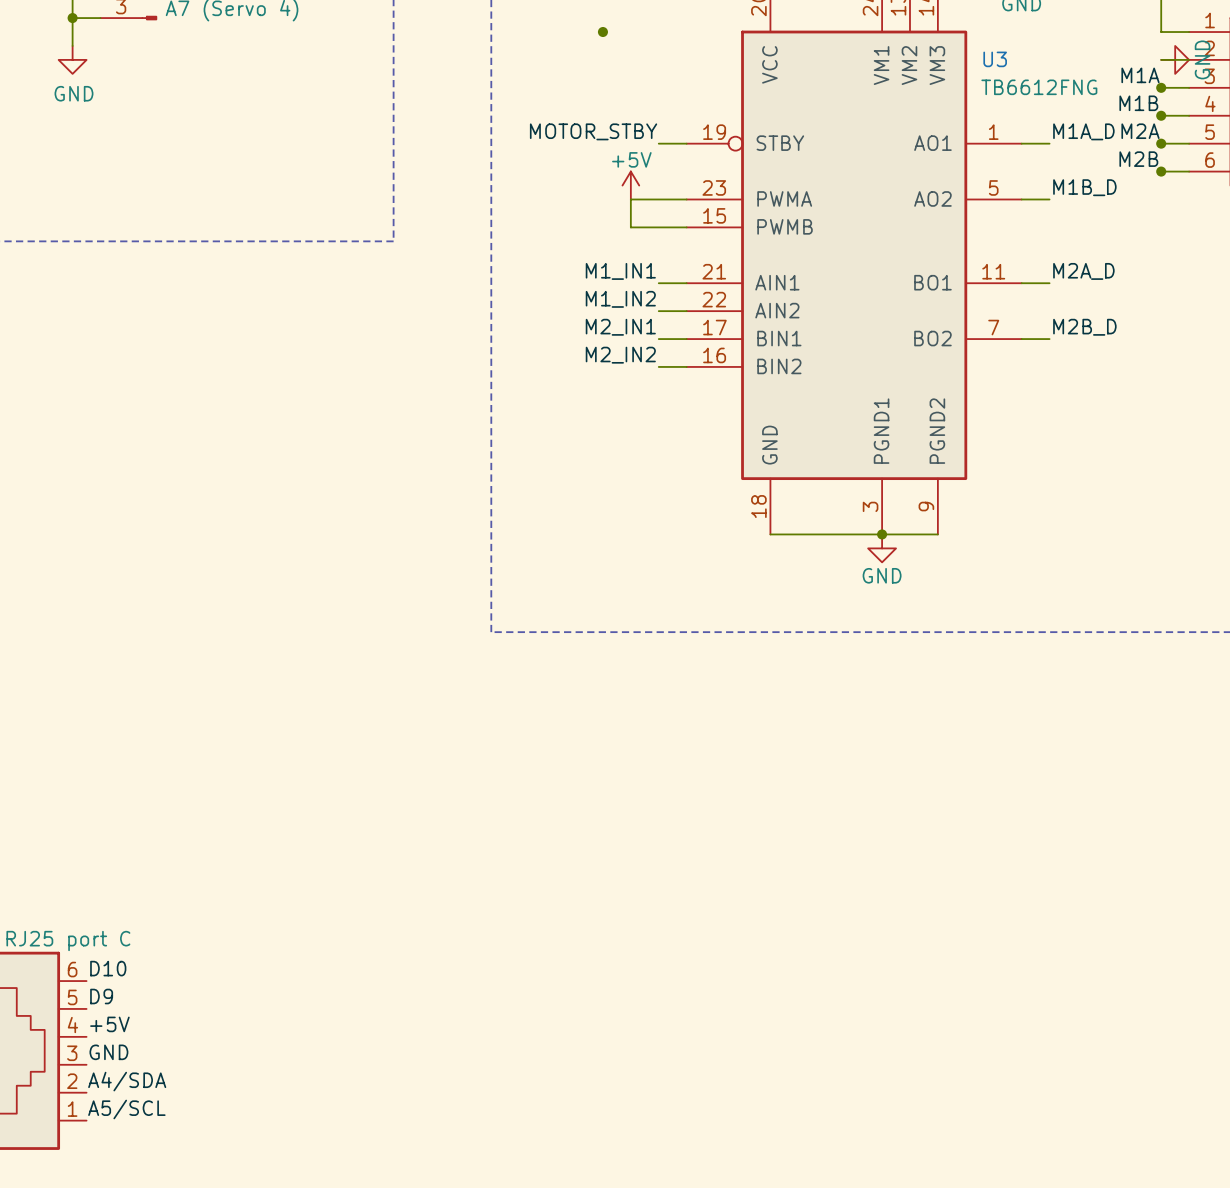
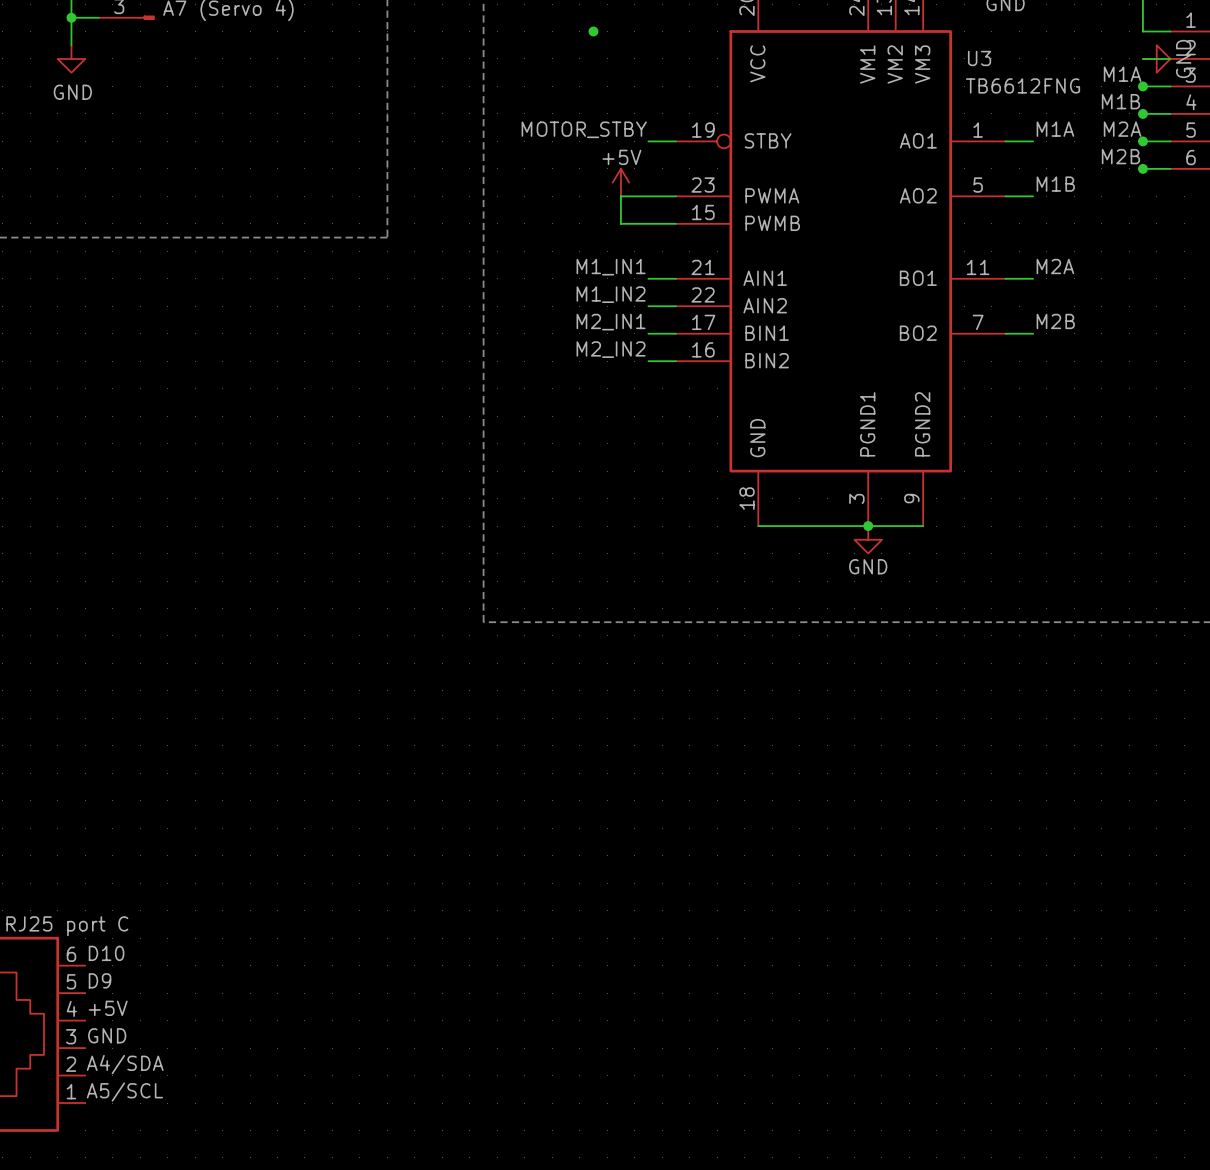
label: M1A_D (1083, 131) -> M1A (1055, 129)
label: M1B_D (1084, 187) -> M1B (1055, 184)
label: M2A_D (1083, 271) -> M2A (1055, 266)
label: M2B_D (1084, 327) -> M2B (1055, 321)

